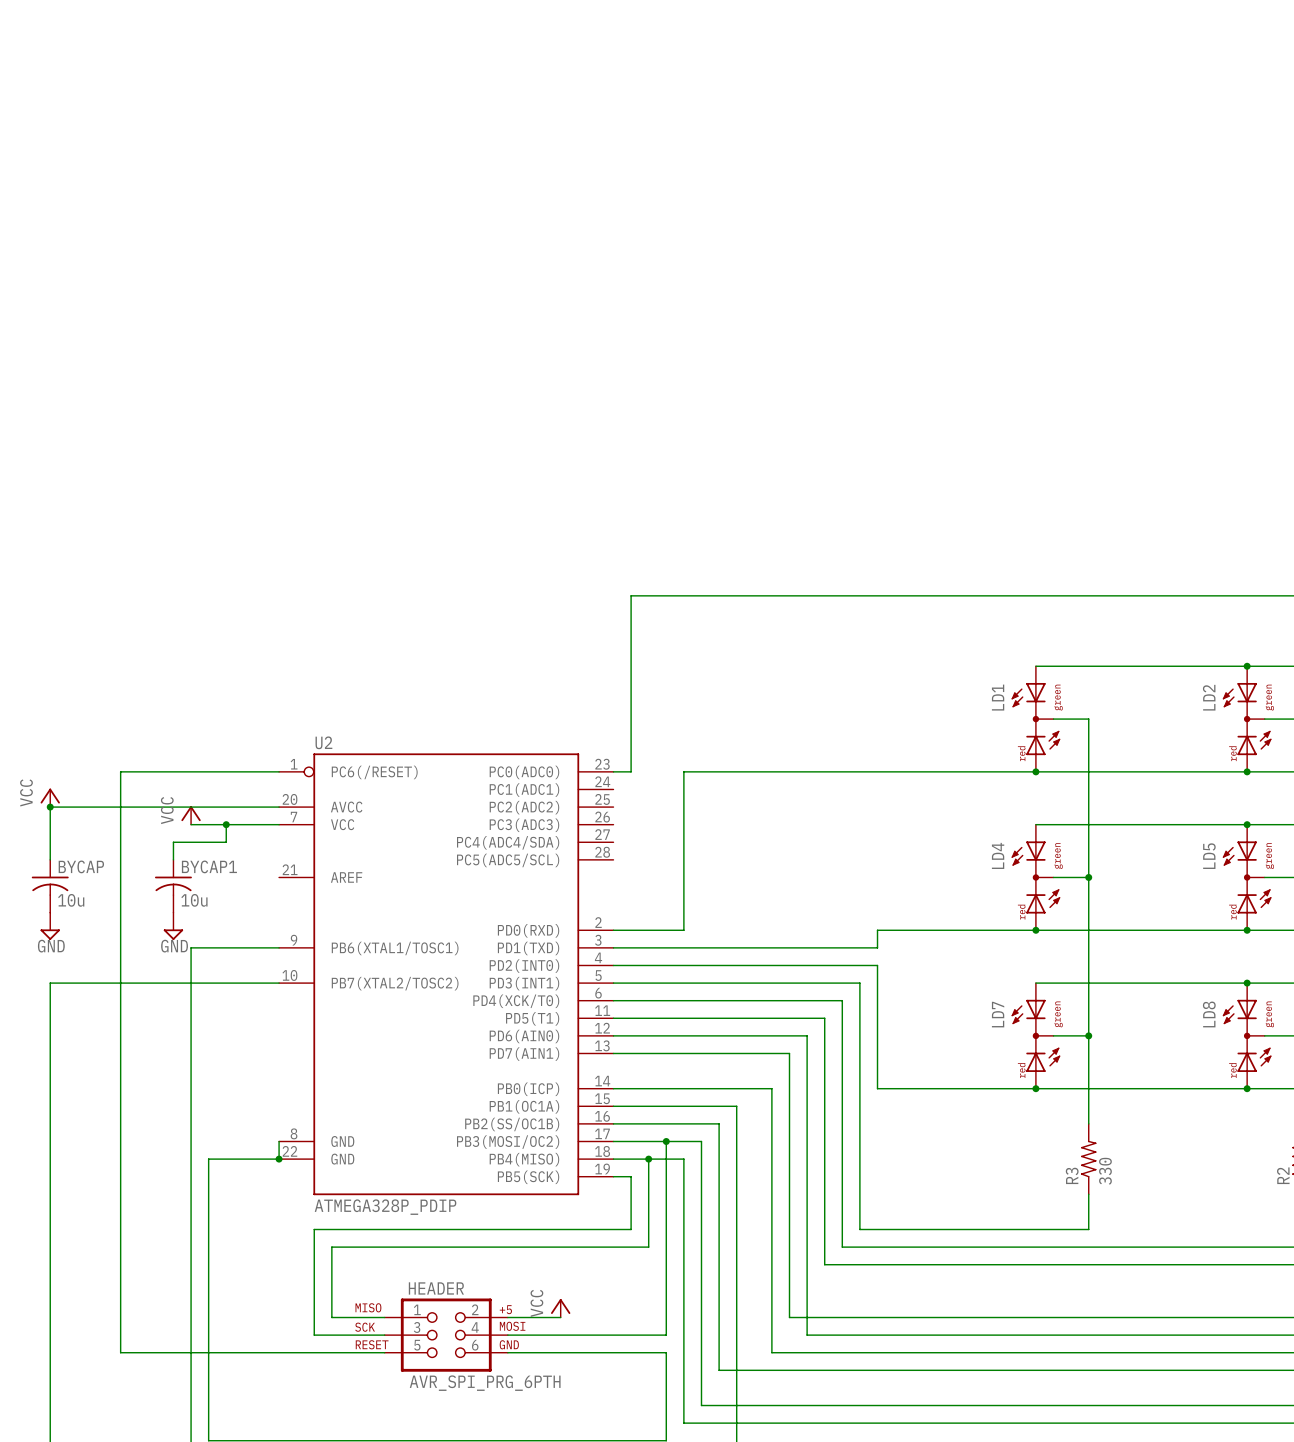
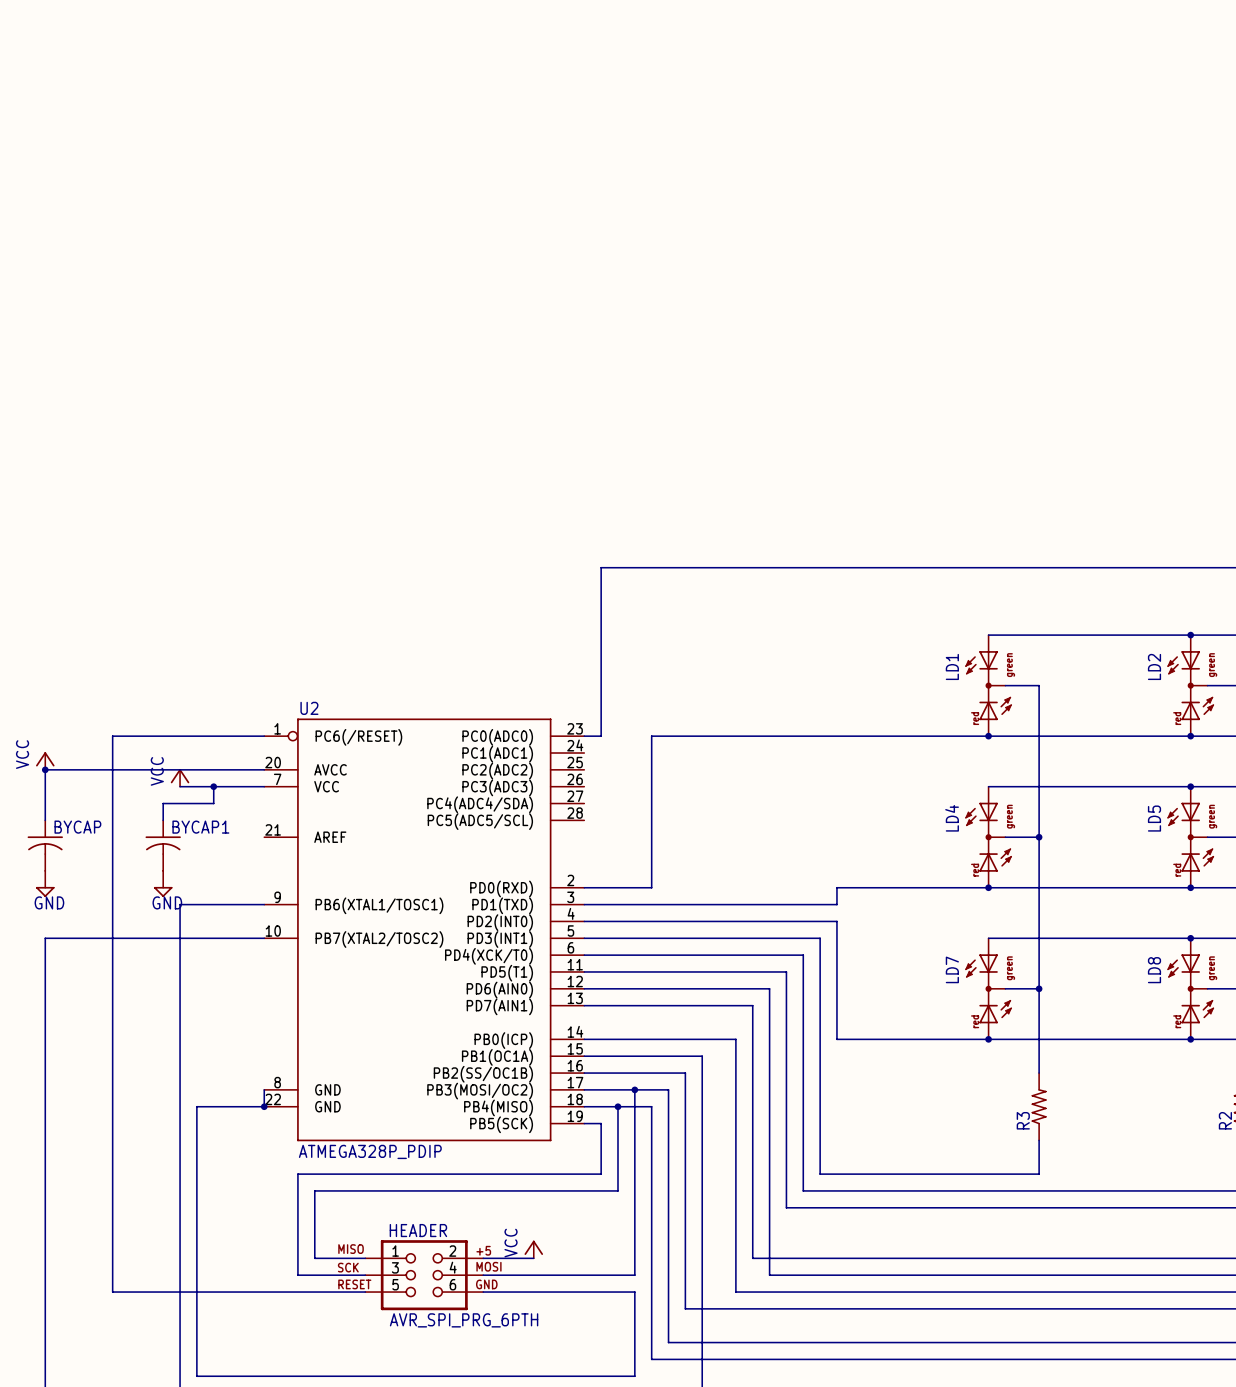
BYCAP value: 10u (71, 900) -> none
BYCAP1 value: 10u (194, 900) -> none
R3 value: 330 (1105, 1171) -> none

